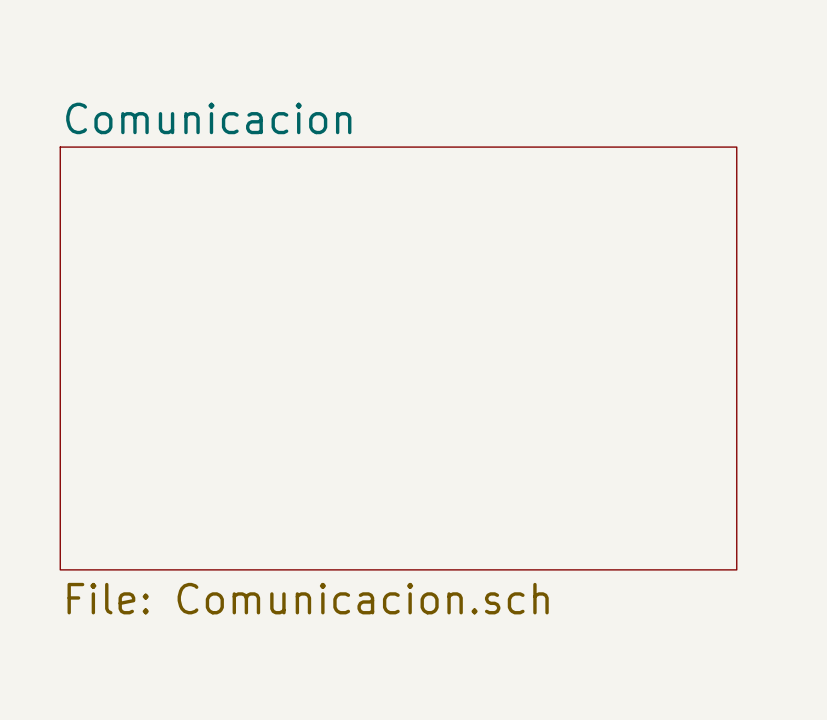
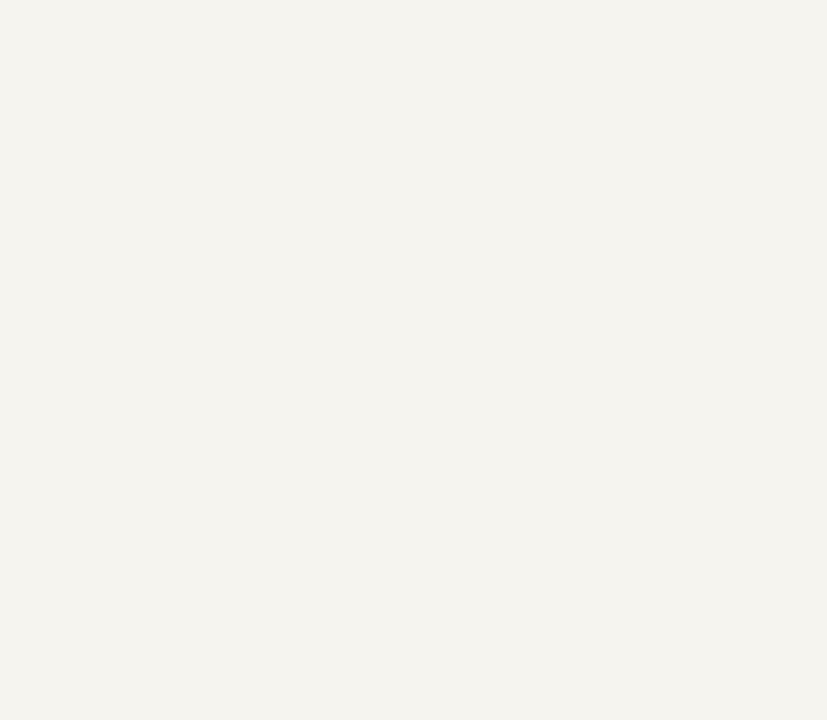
sheet Comunicacion: File: Comunicacion.sch (398, 358) -> none

